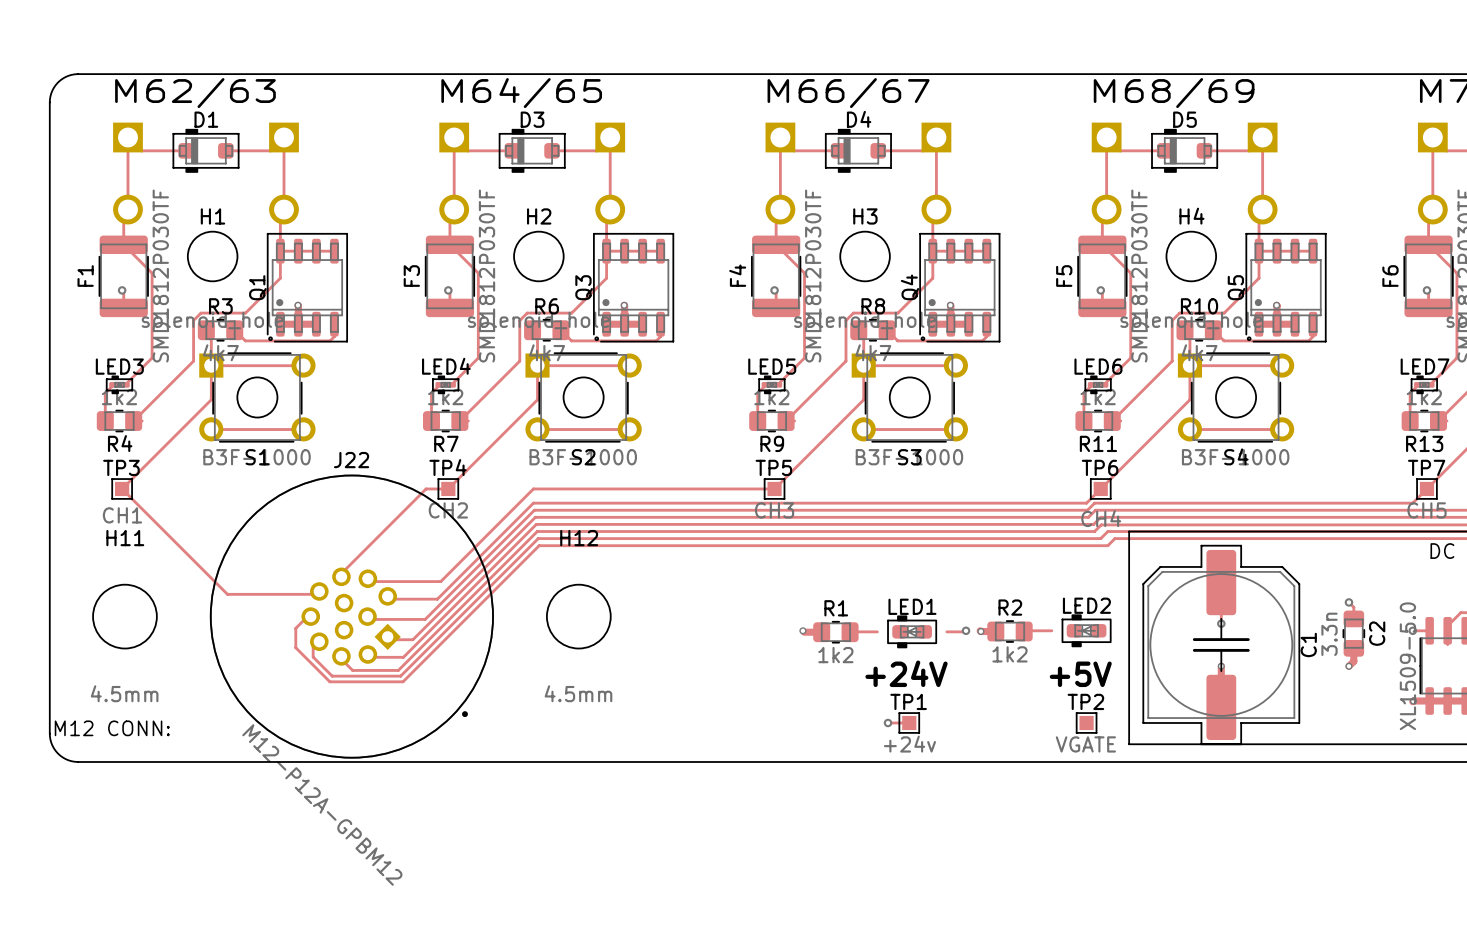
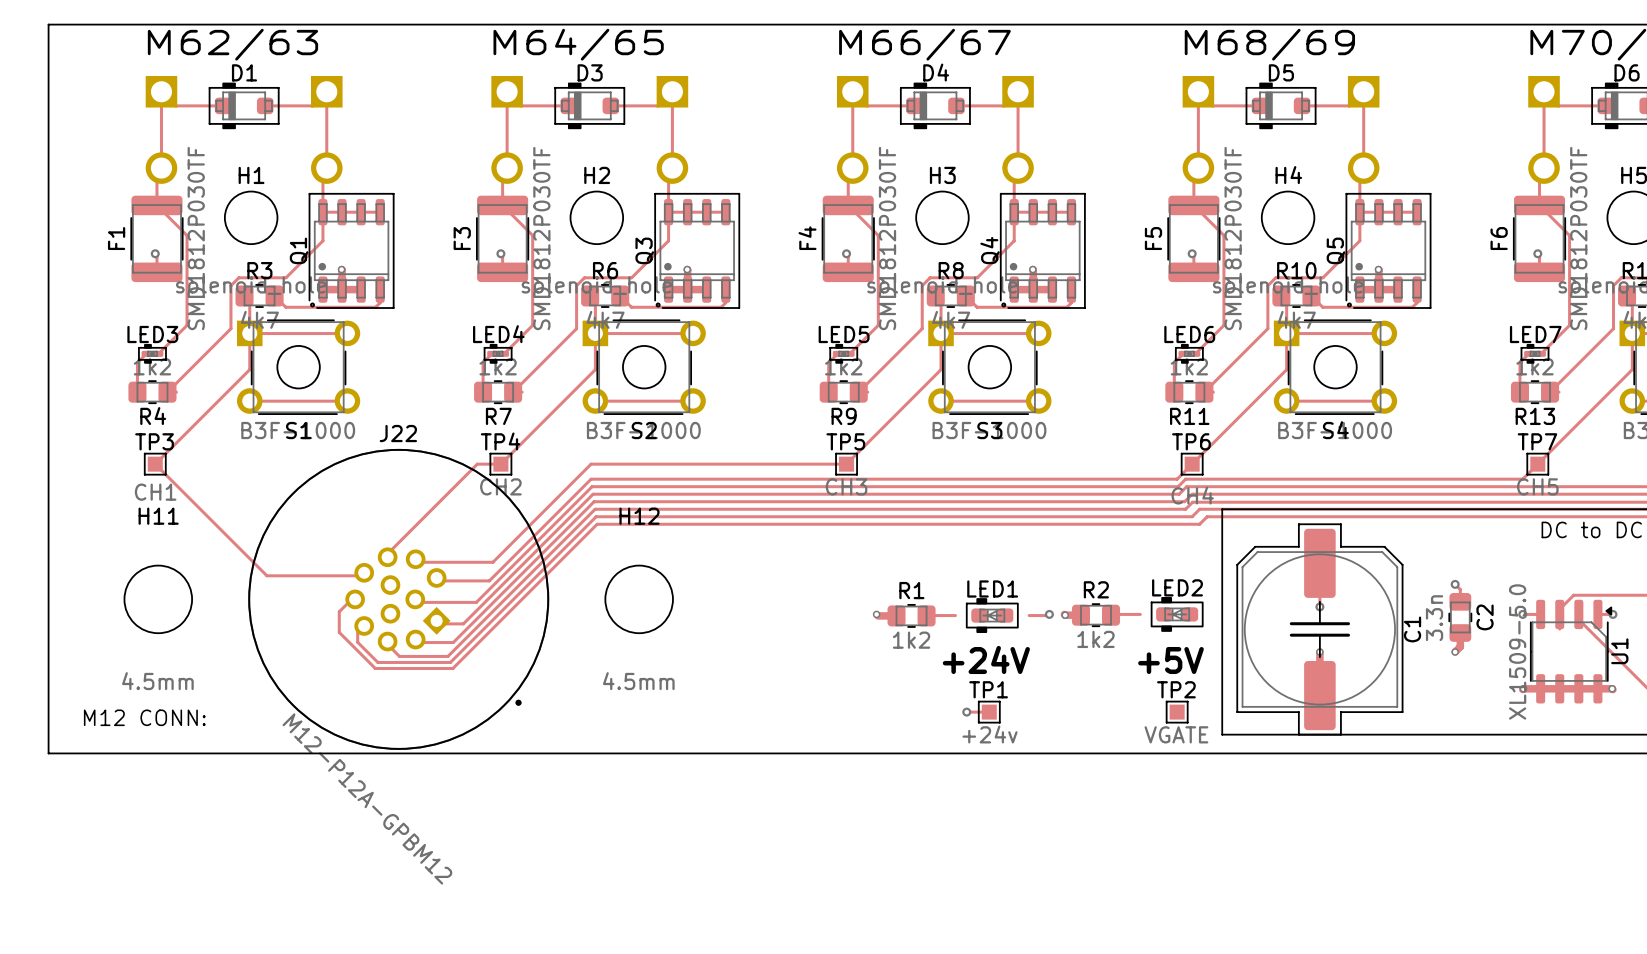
board edge: (78, 74) (65, 76) (58, 82) (51, 93) (49, 102) (49, 733) (52, 745) (58, 753) (68, 760) (78, 761) -> (108, 24) (48, 24) (48, 753) (108, 753)

